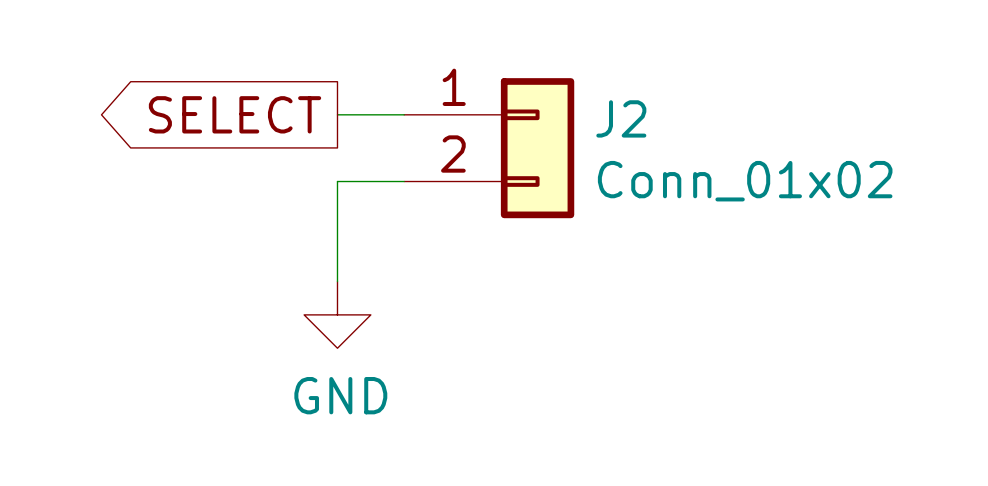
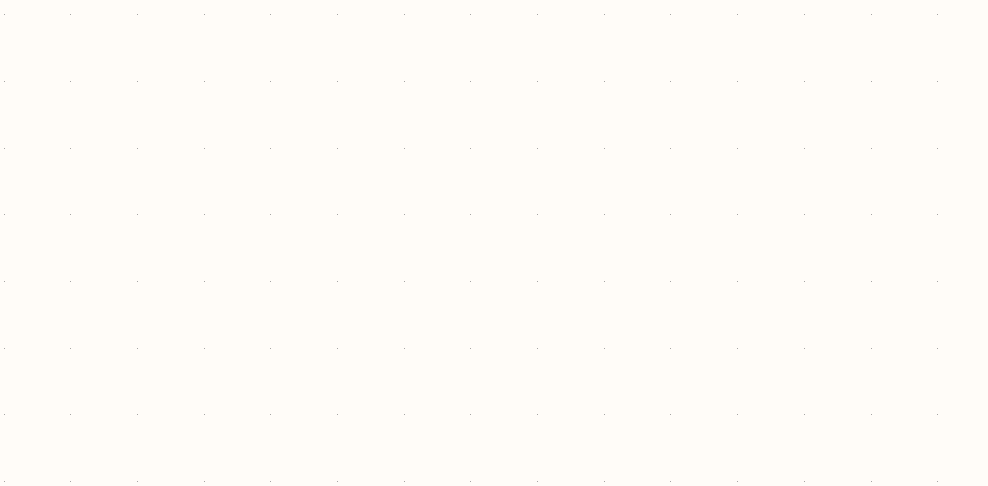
global label: SELECT (235, 114) -> none
wire: (337, 114) (404, 114) -> none
J2: Conn_01x02 (489, 148) -> none
wire: (404, 181) (337, 181) (337, 281) -> none
power symbol: GND (337, 314) -> none

